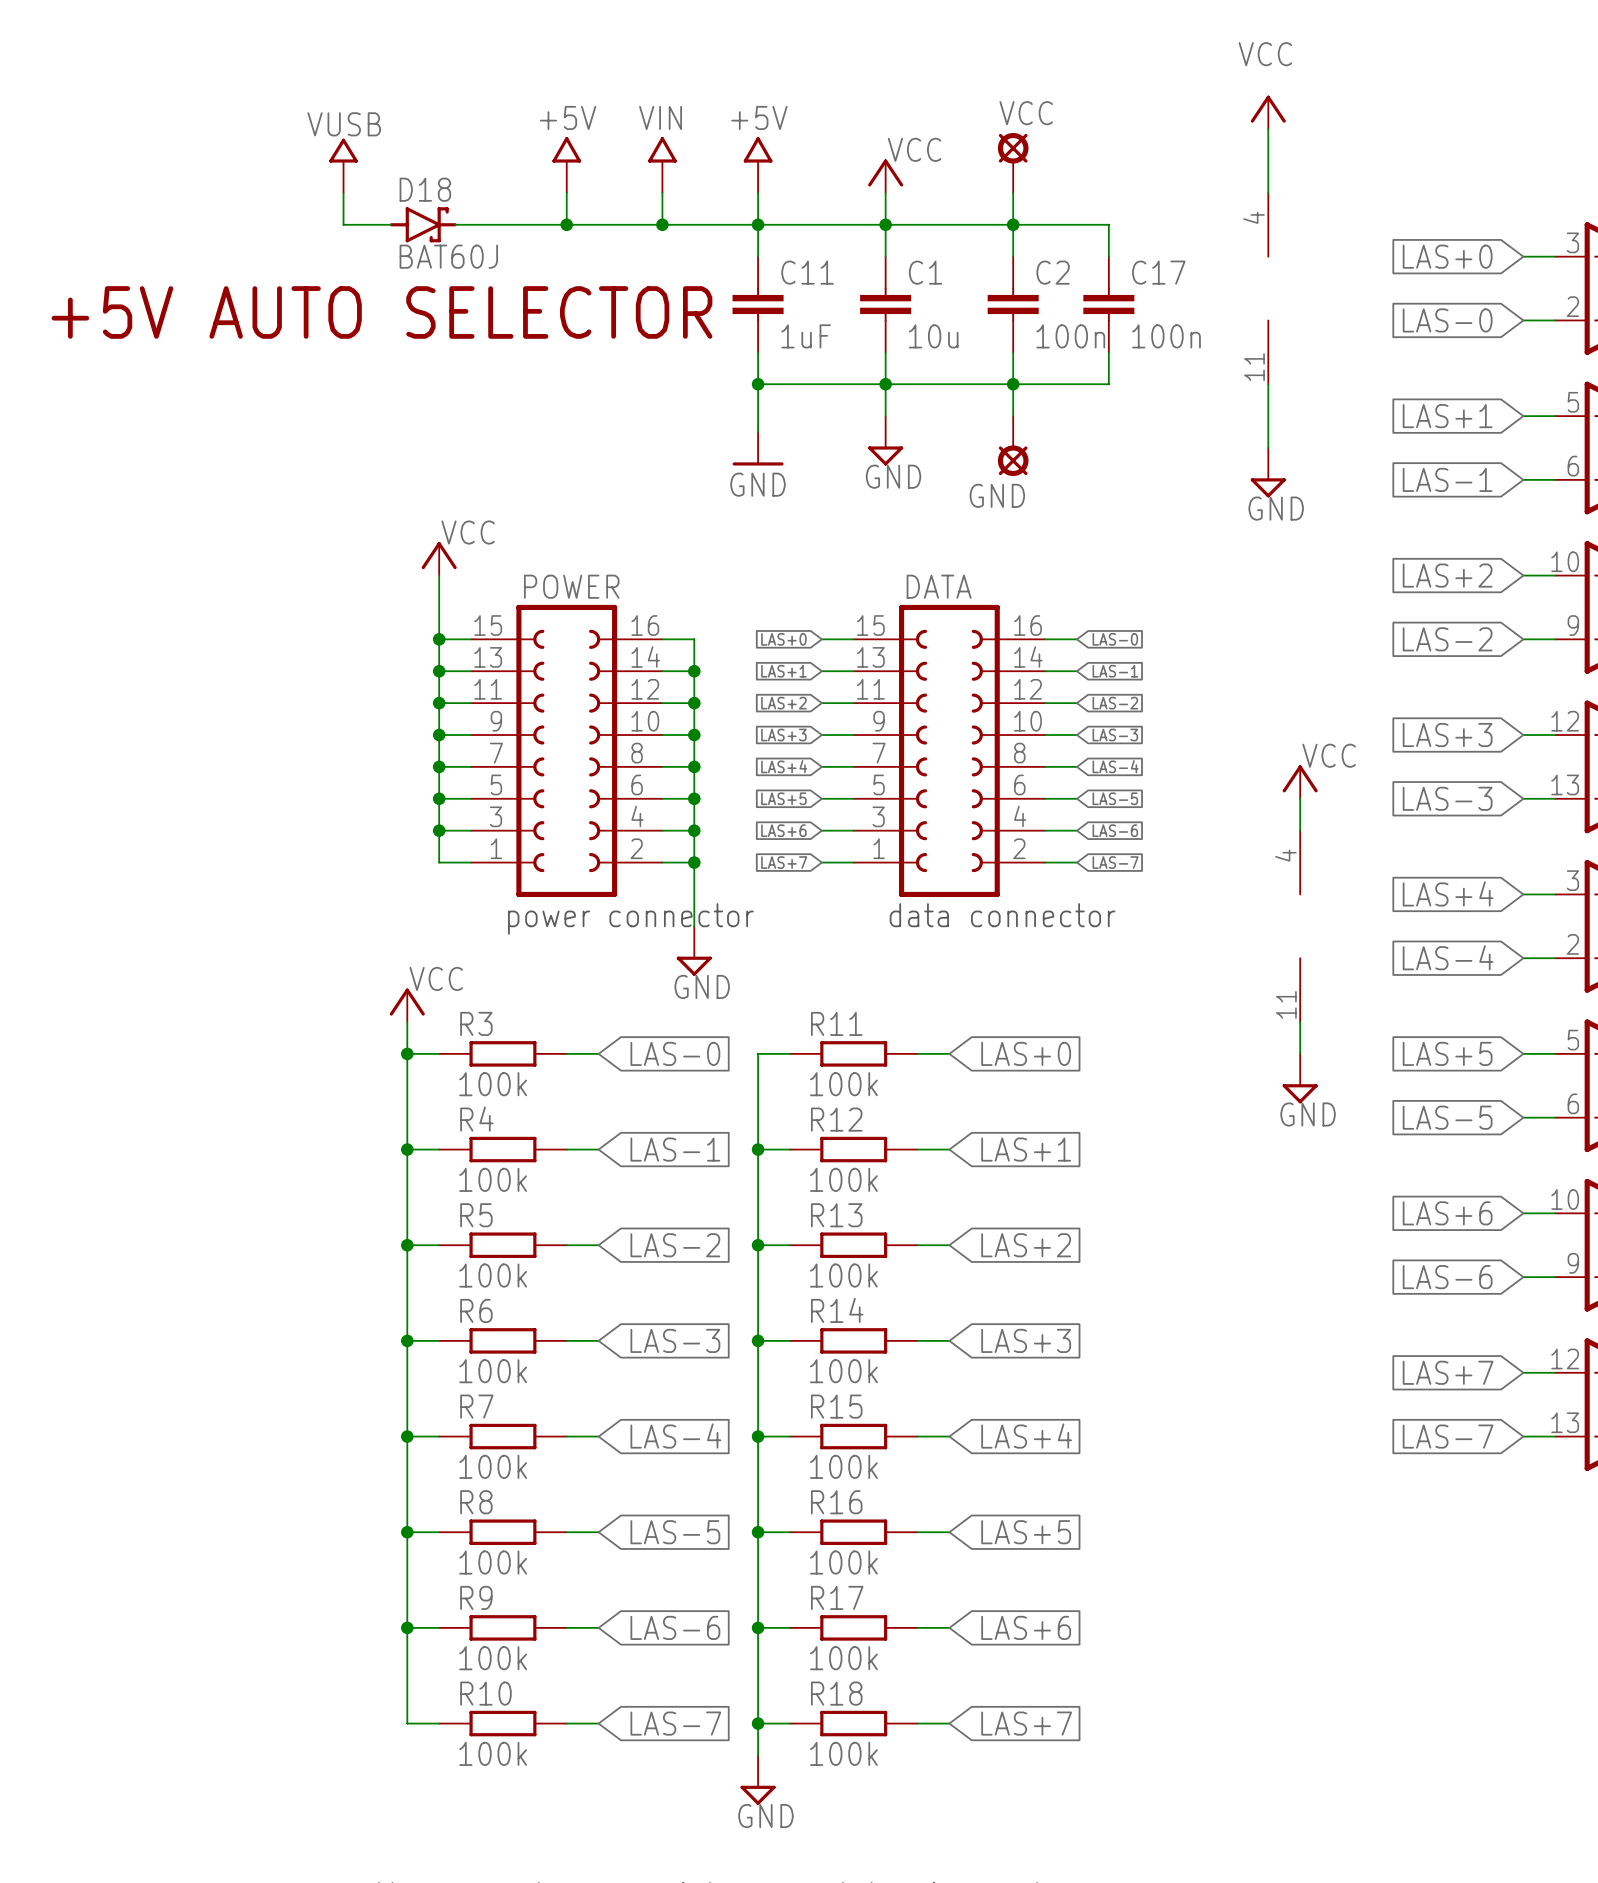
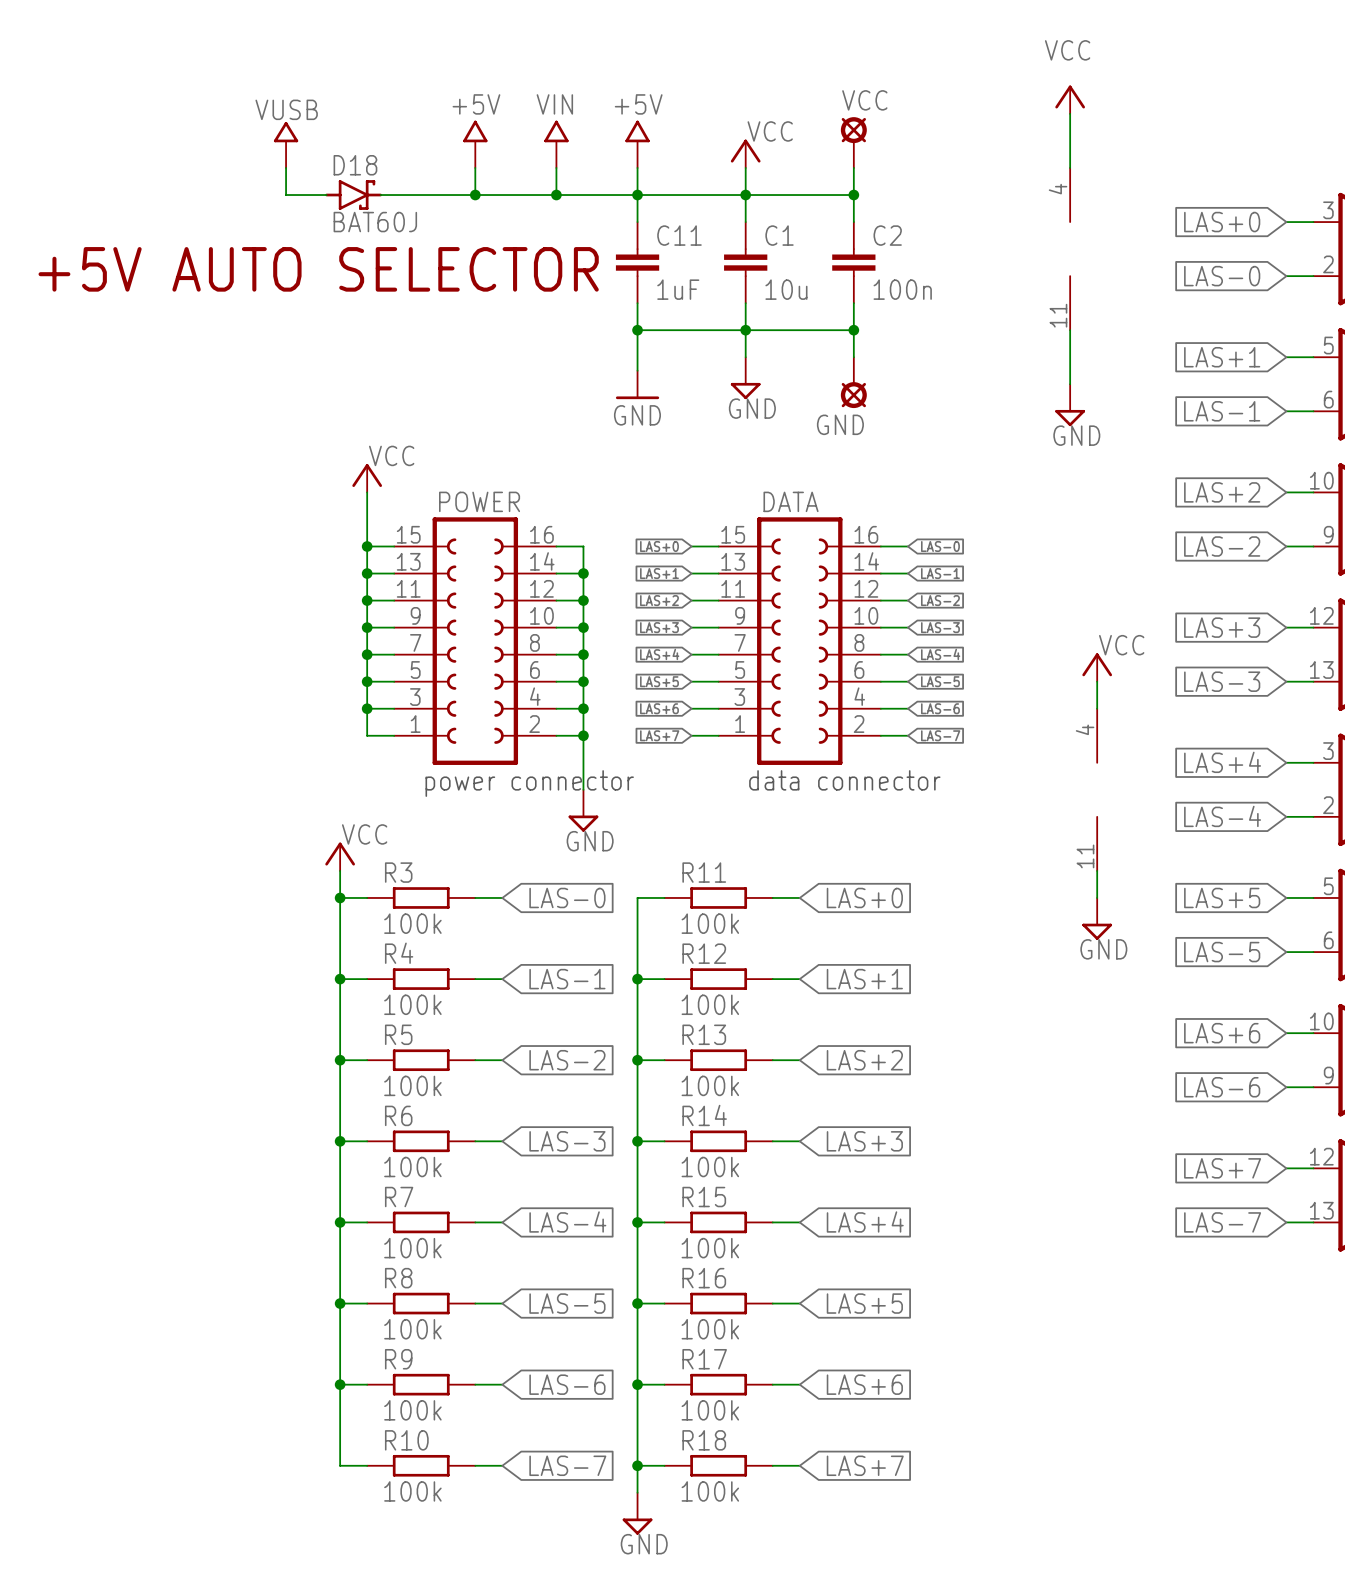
wire: (1013, 224) (1108, 224) (1108, 256) -> none
C17: 100n (1108, 304) -> none
wire: (1108, 352) (1108, 384) (1013, 384) -> none

